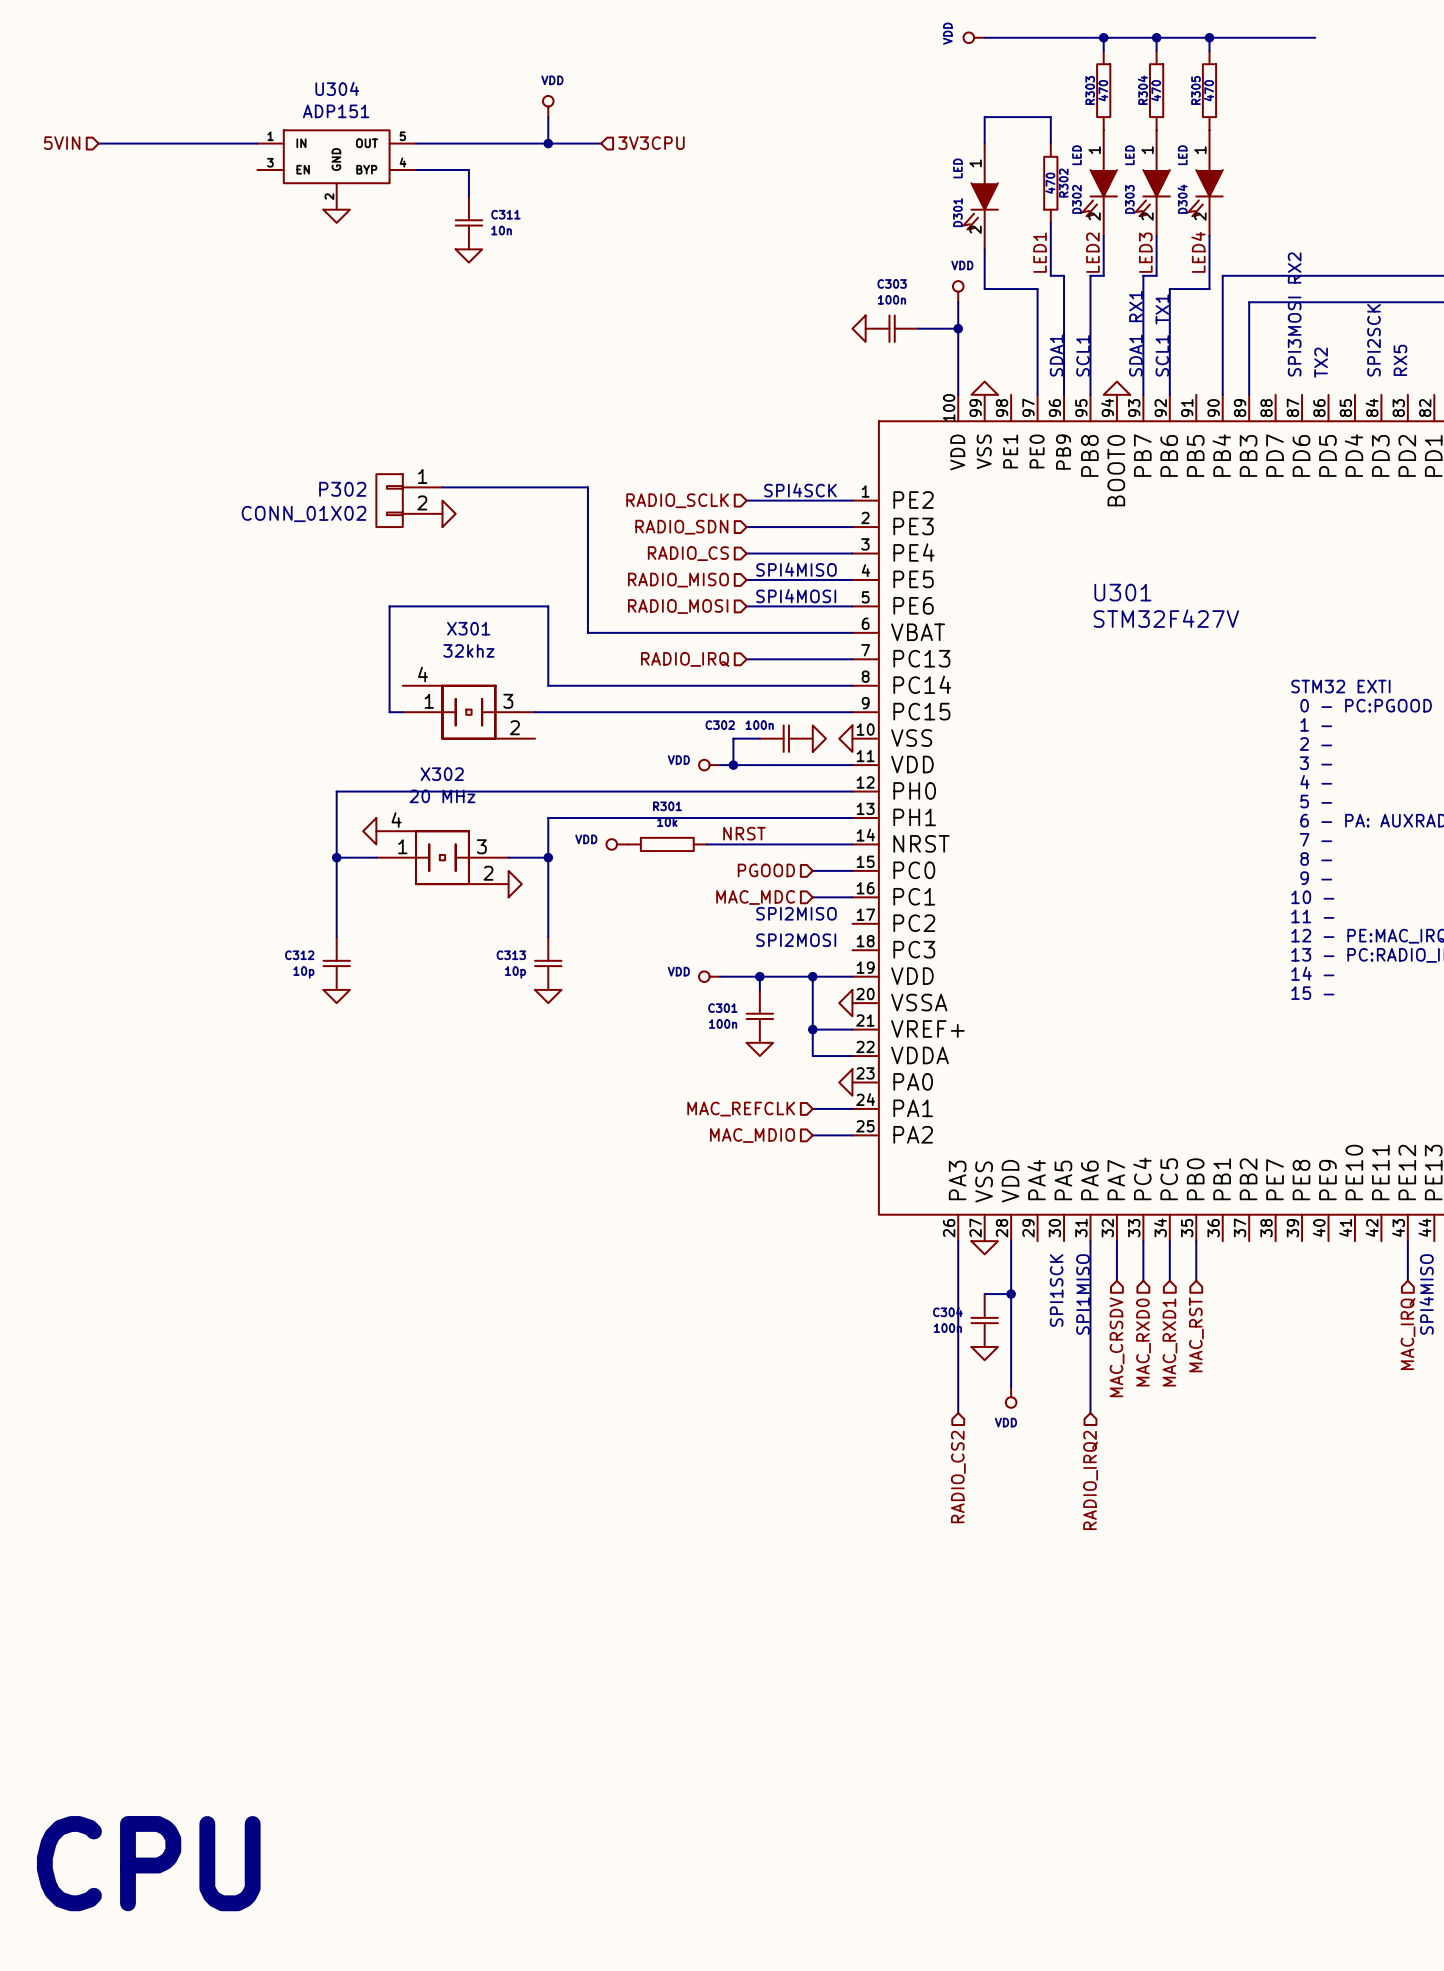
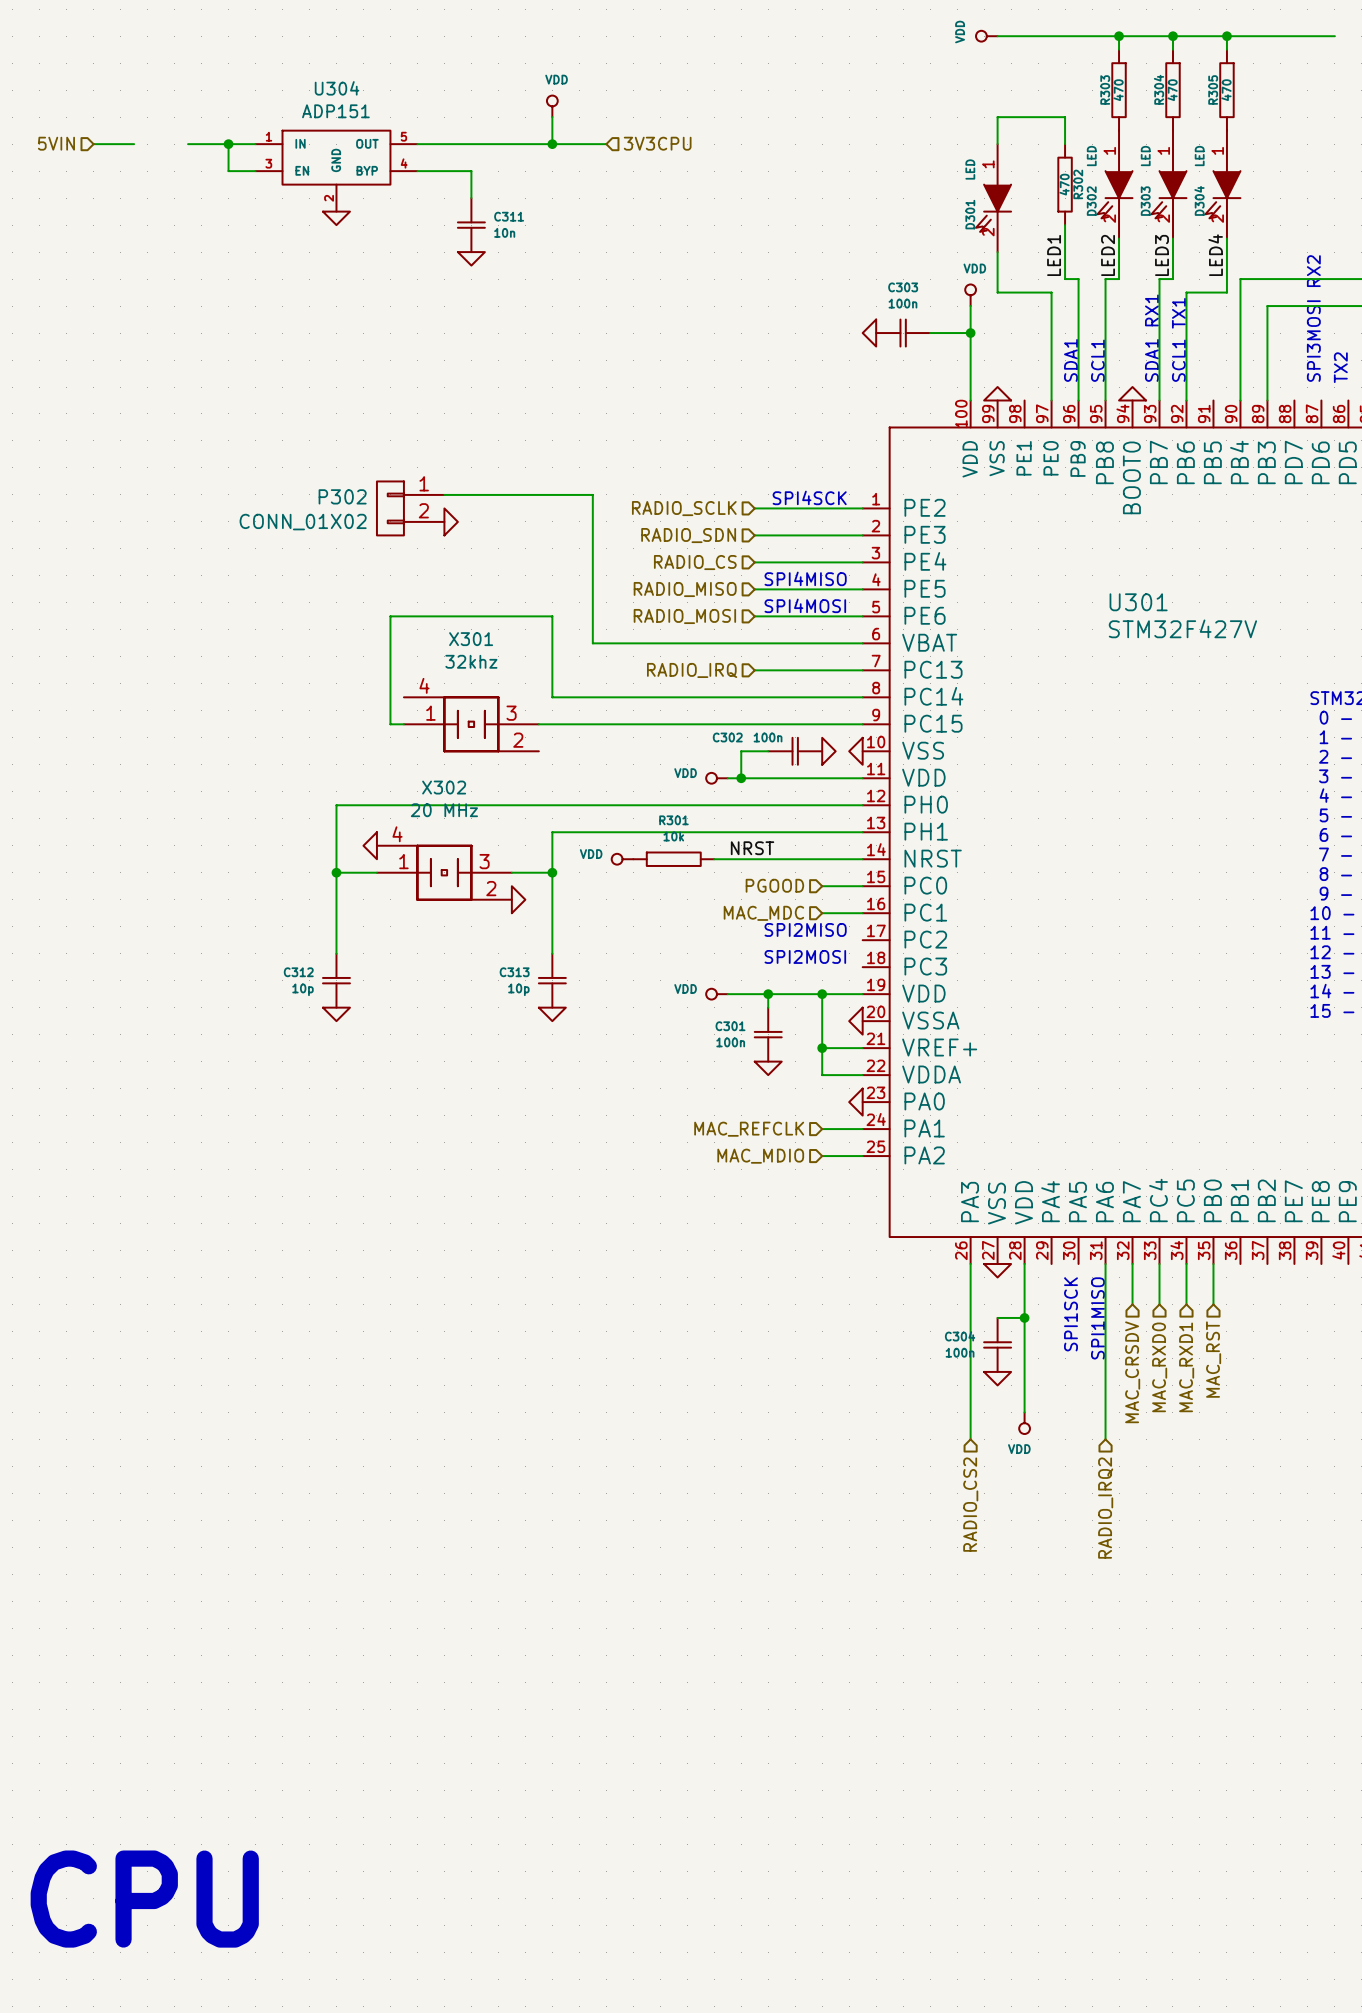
wire: (138, 143) (191, 143) -> none
wire: none -> (228, 144) (228, 171) (255, 171)
junction: none -> (228, 144)

